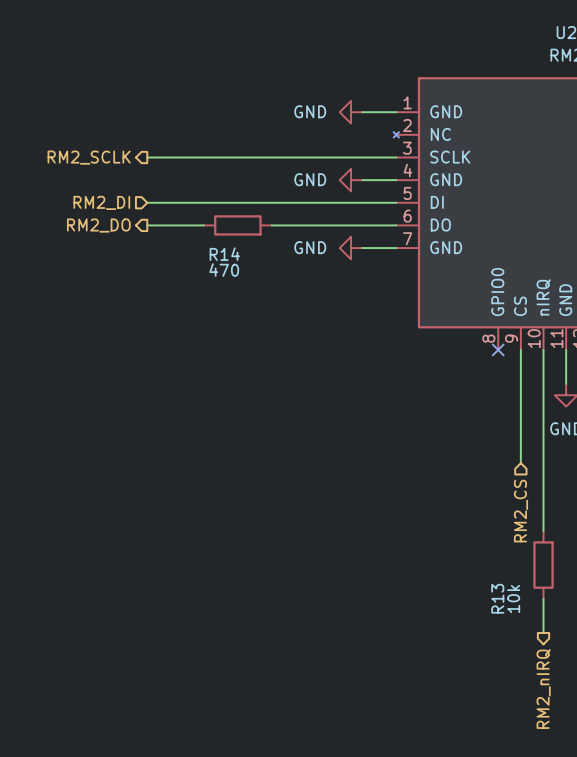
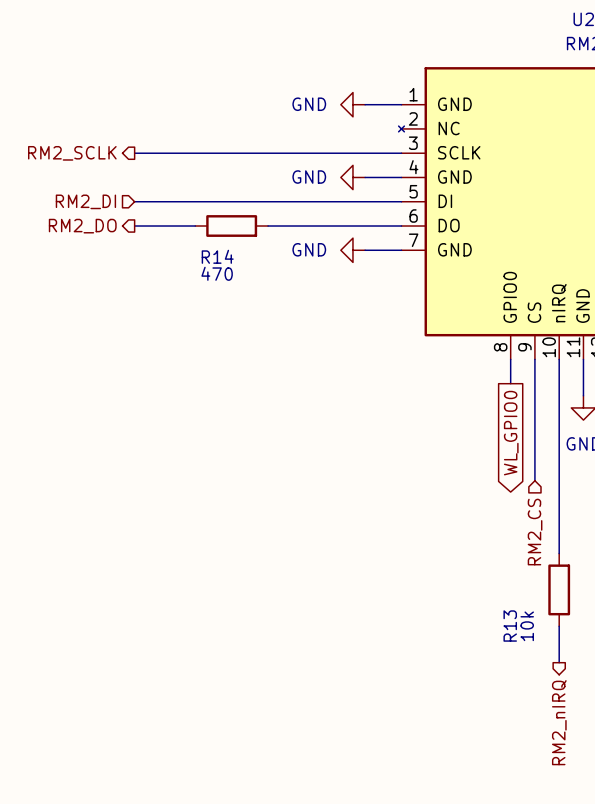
wire: none -> (510, 359) (510, 383)
no-connect mark: (498, 349) -> none
global label: none -> WL_GPIO0 (511, 433)

